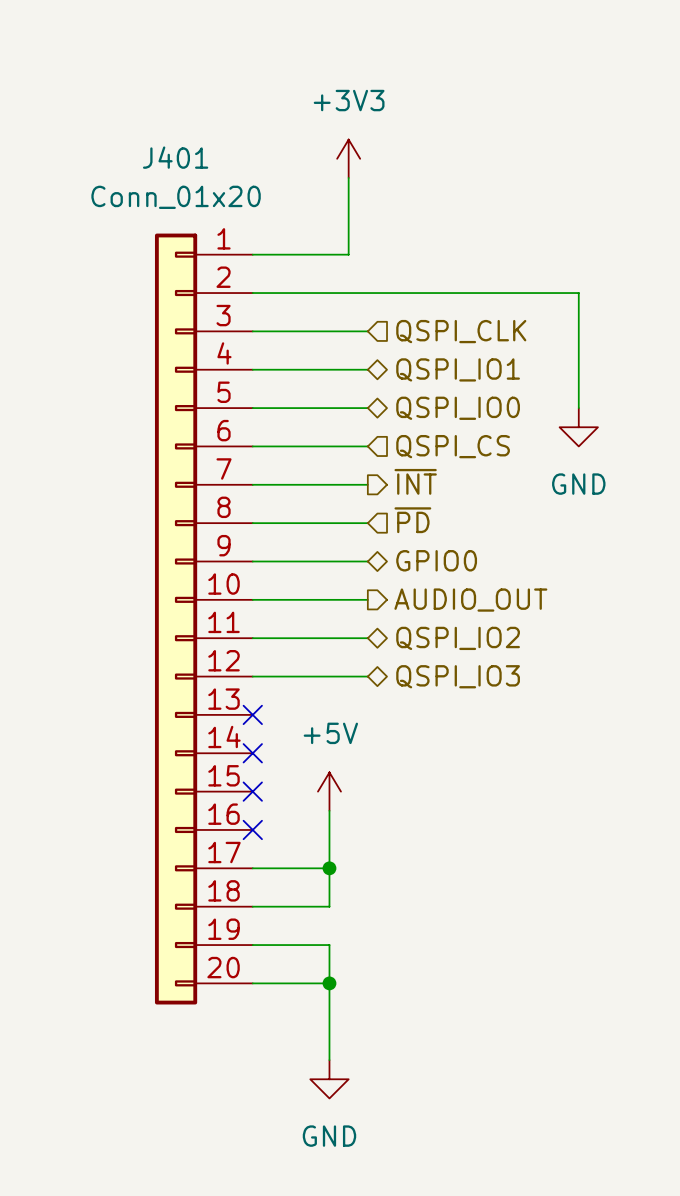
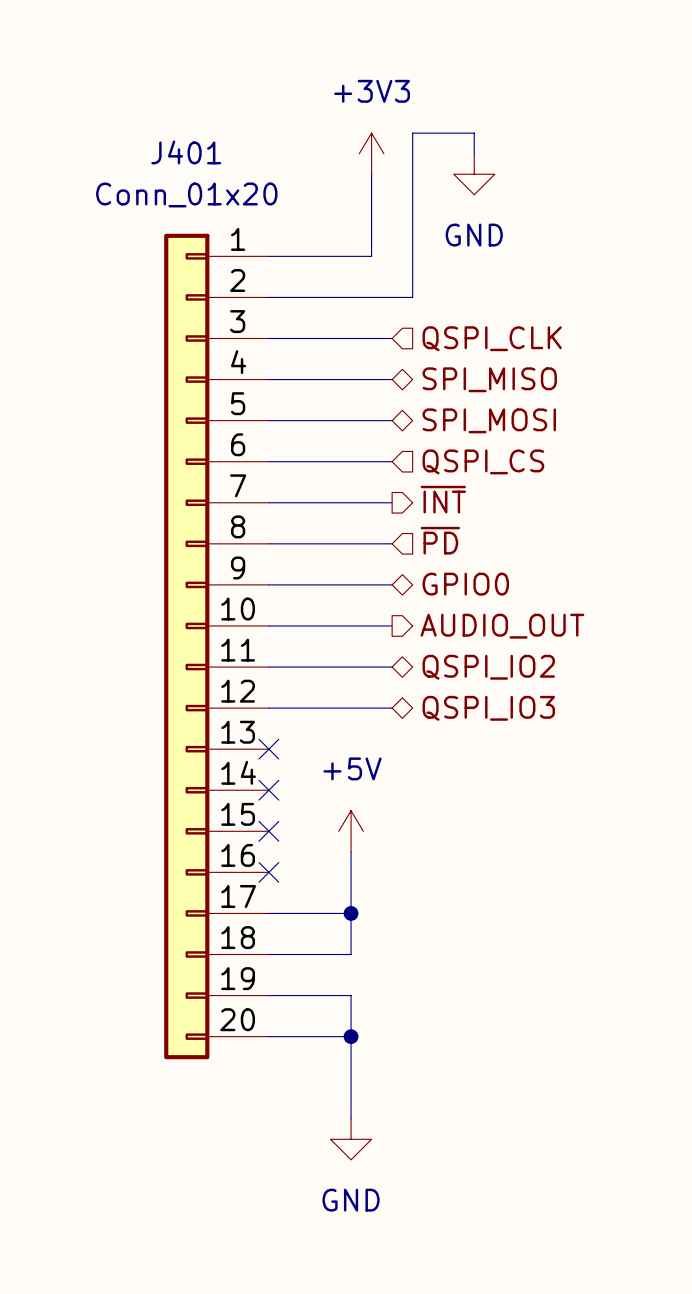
wire: (387, 293) (578, 293) (578, 408) -> (412, 297) (412, 133) (474, 133) (474, 153)
hierarchical label: QSPI_IO1 (458, 369) -> SPI_MISO (489, 379)
hierarchical label: QSPI_IO0 (458, 408) -> SPI_MOSI (489, 420)
power symbol position: GND (578, 427) -> GND (474, 174)

